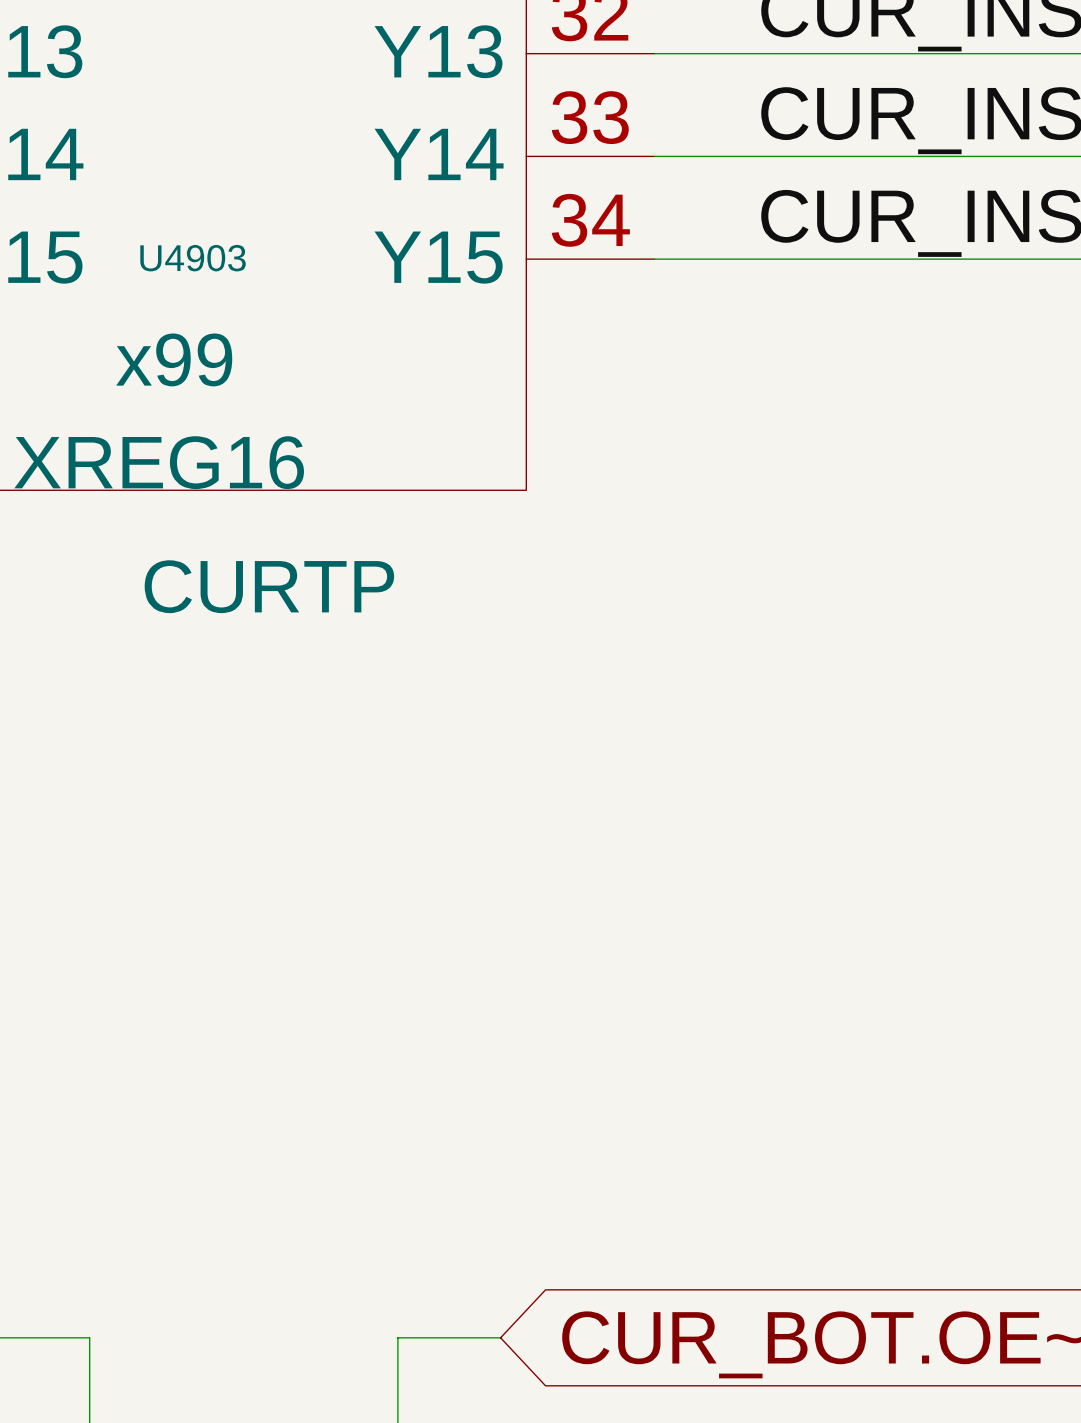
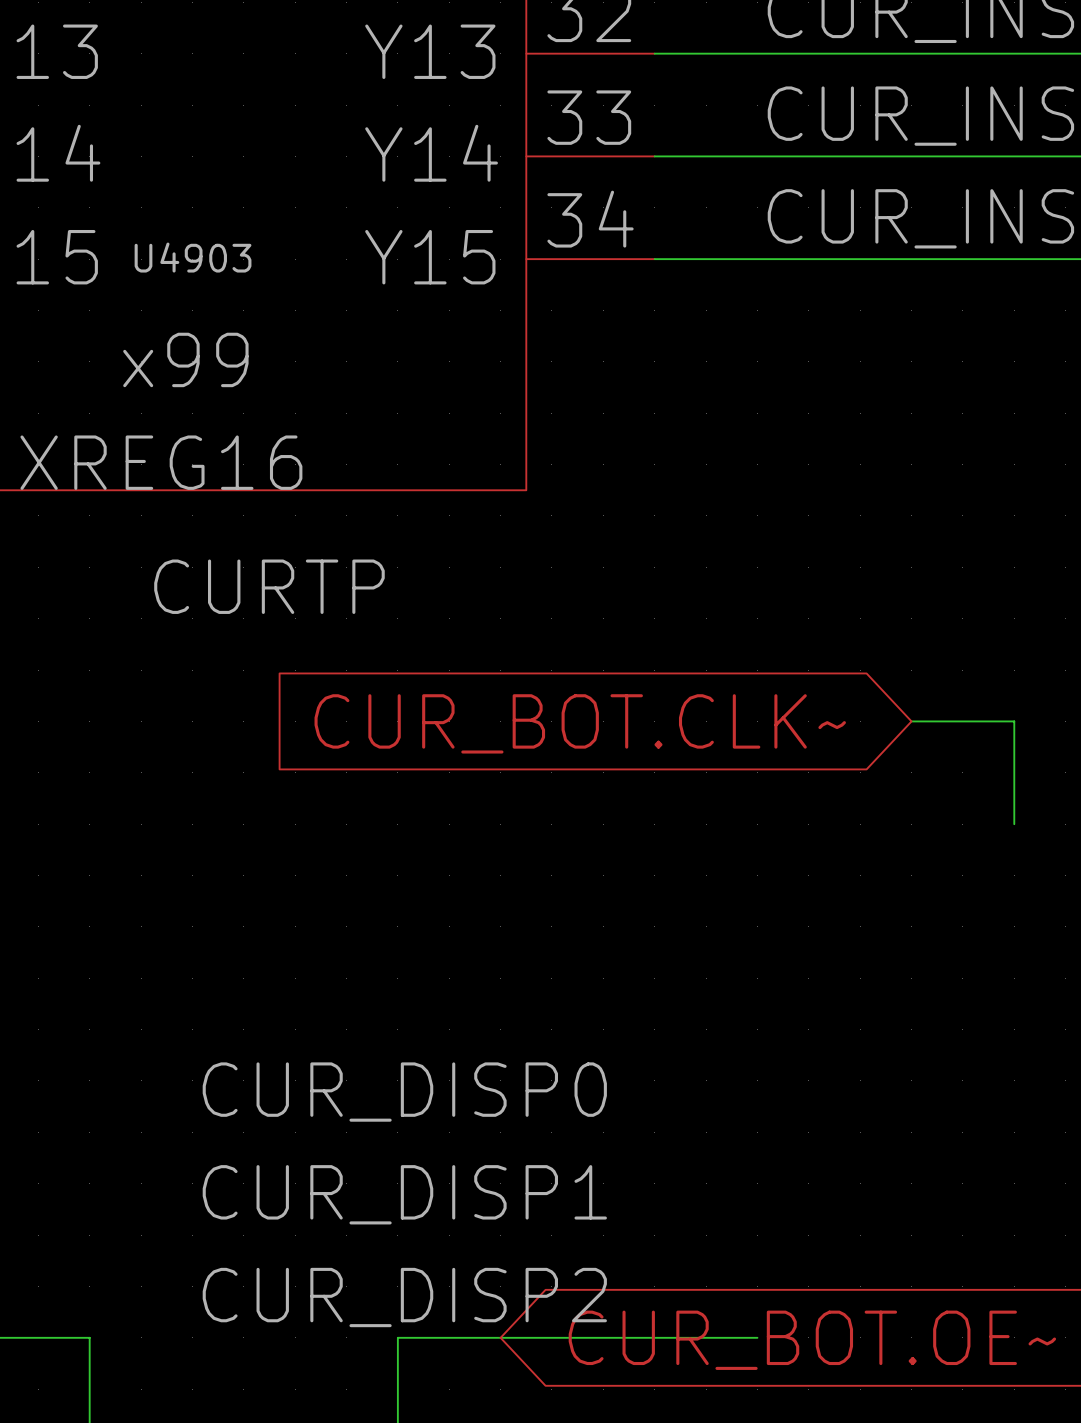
wire: none -> (911, 721) (1014, 721) (1014, 824)
global label: none -> CUR_BOT.CLK~ (580, 723)
label: none -> CUR_DISP0 (404, 1092)
label: none -> CUR_DISP1 (404, 1194)
label: none -> CUR_DISP2 (404, 1297)
wire: none -> (500, 1337) (757, 1337)

